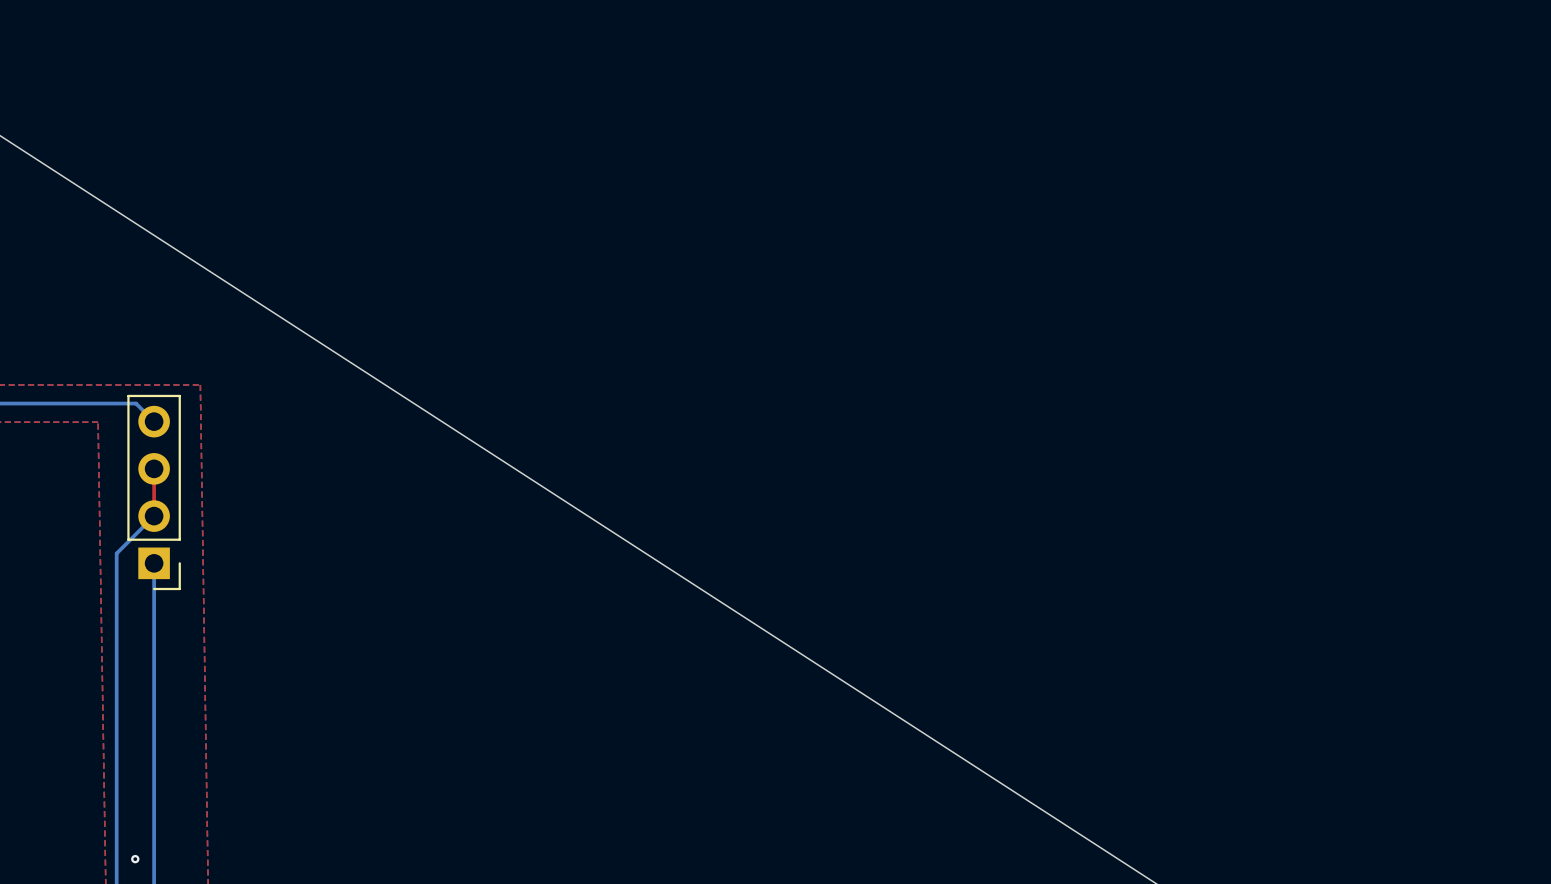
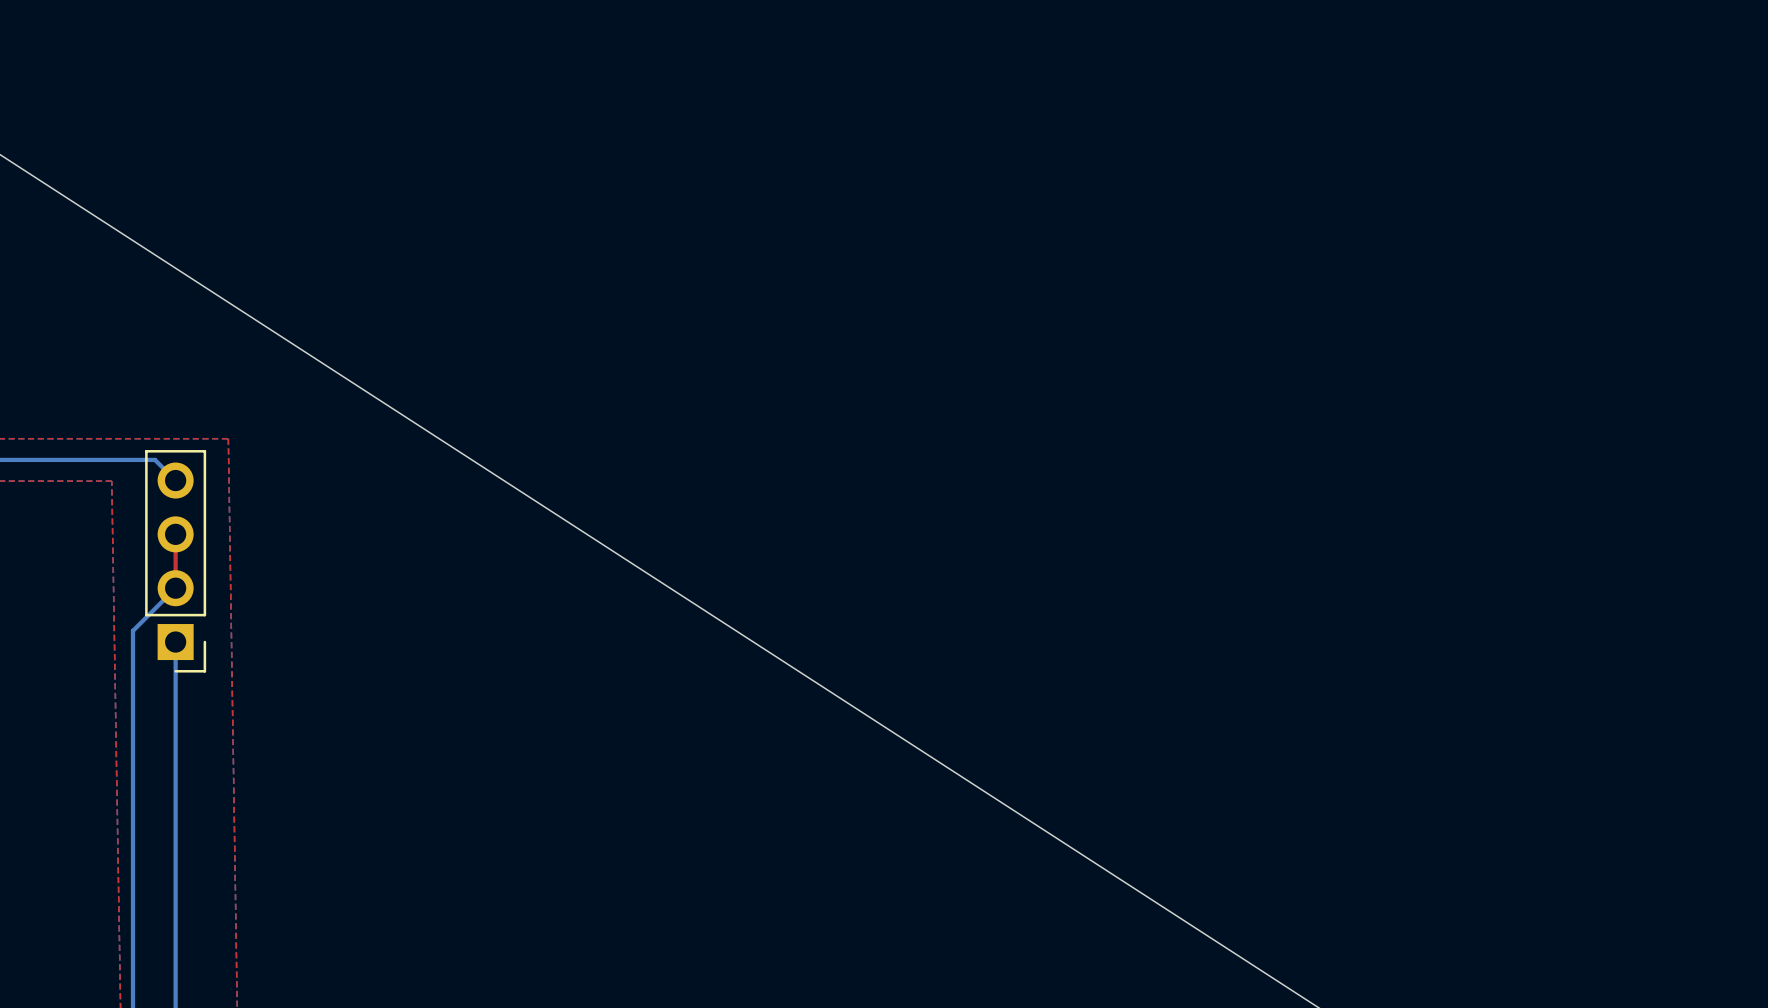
via: (135, 859) -> none

